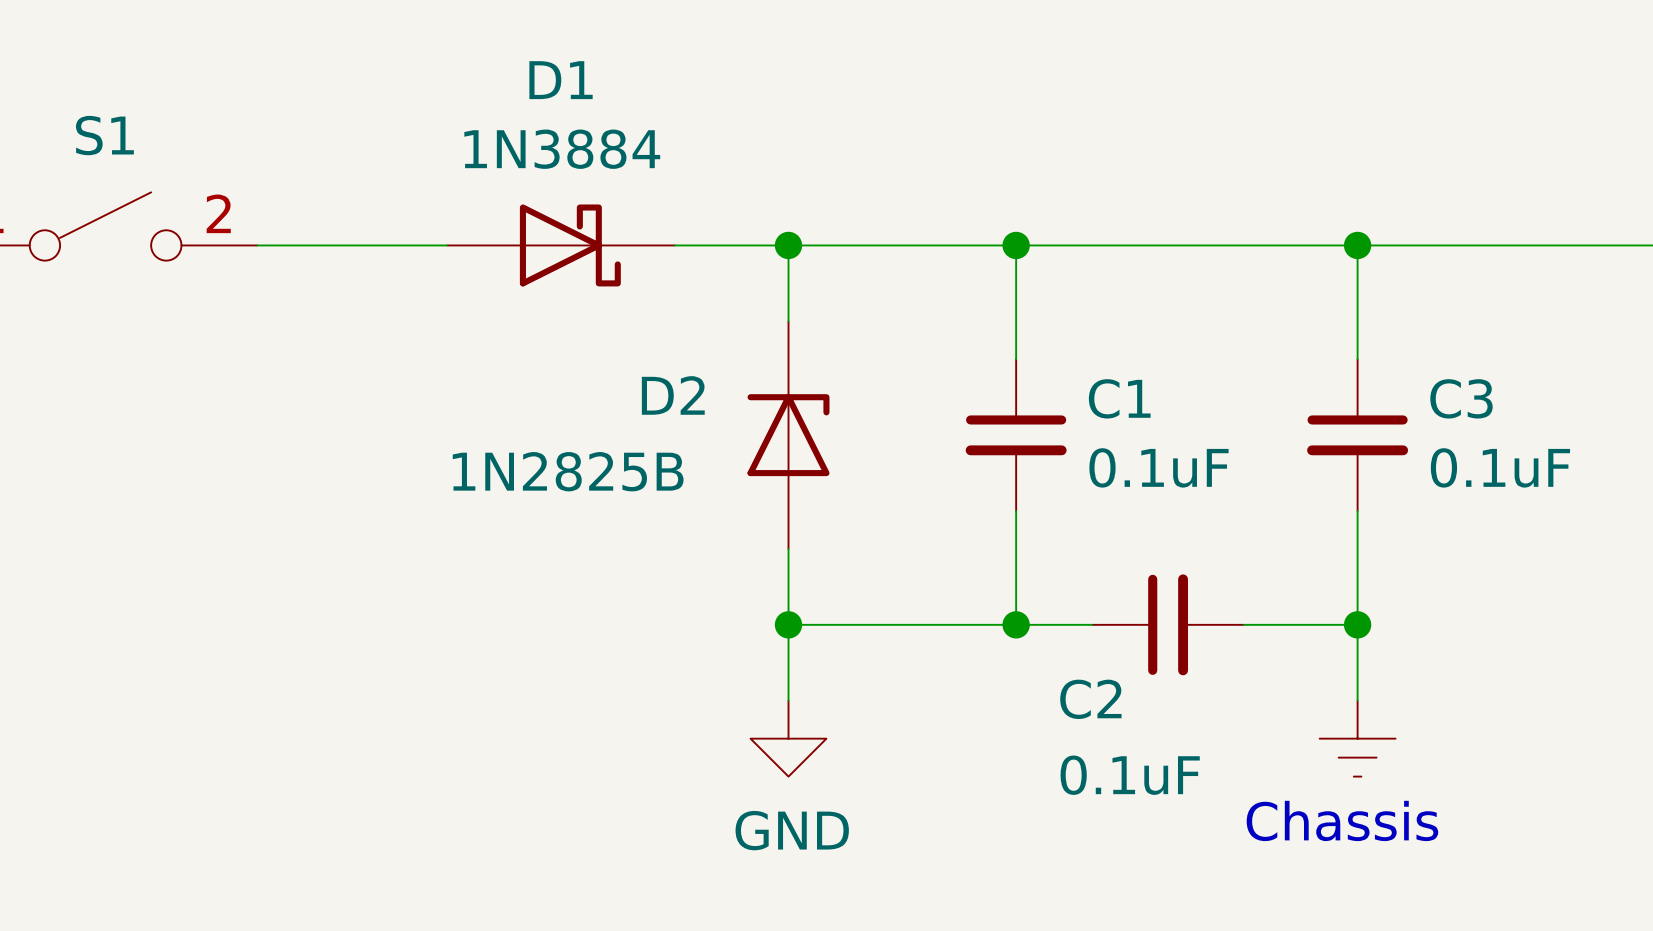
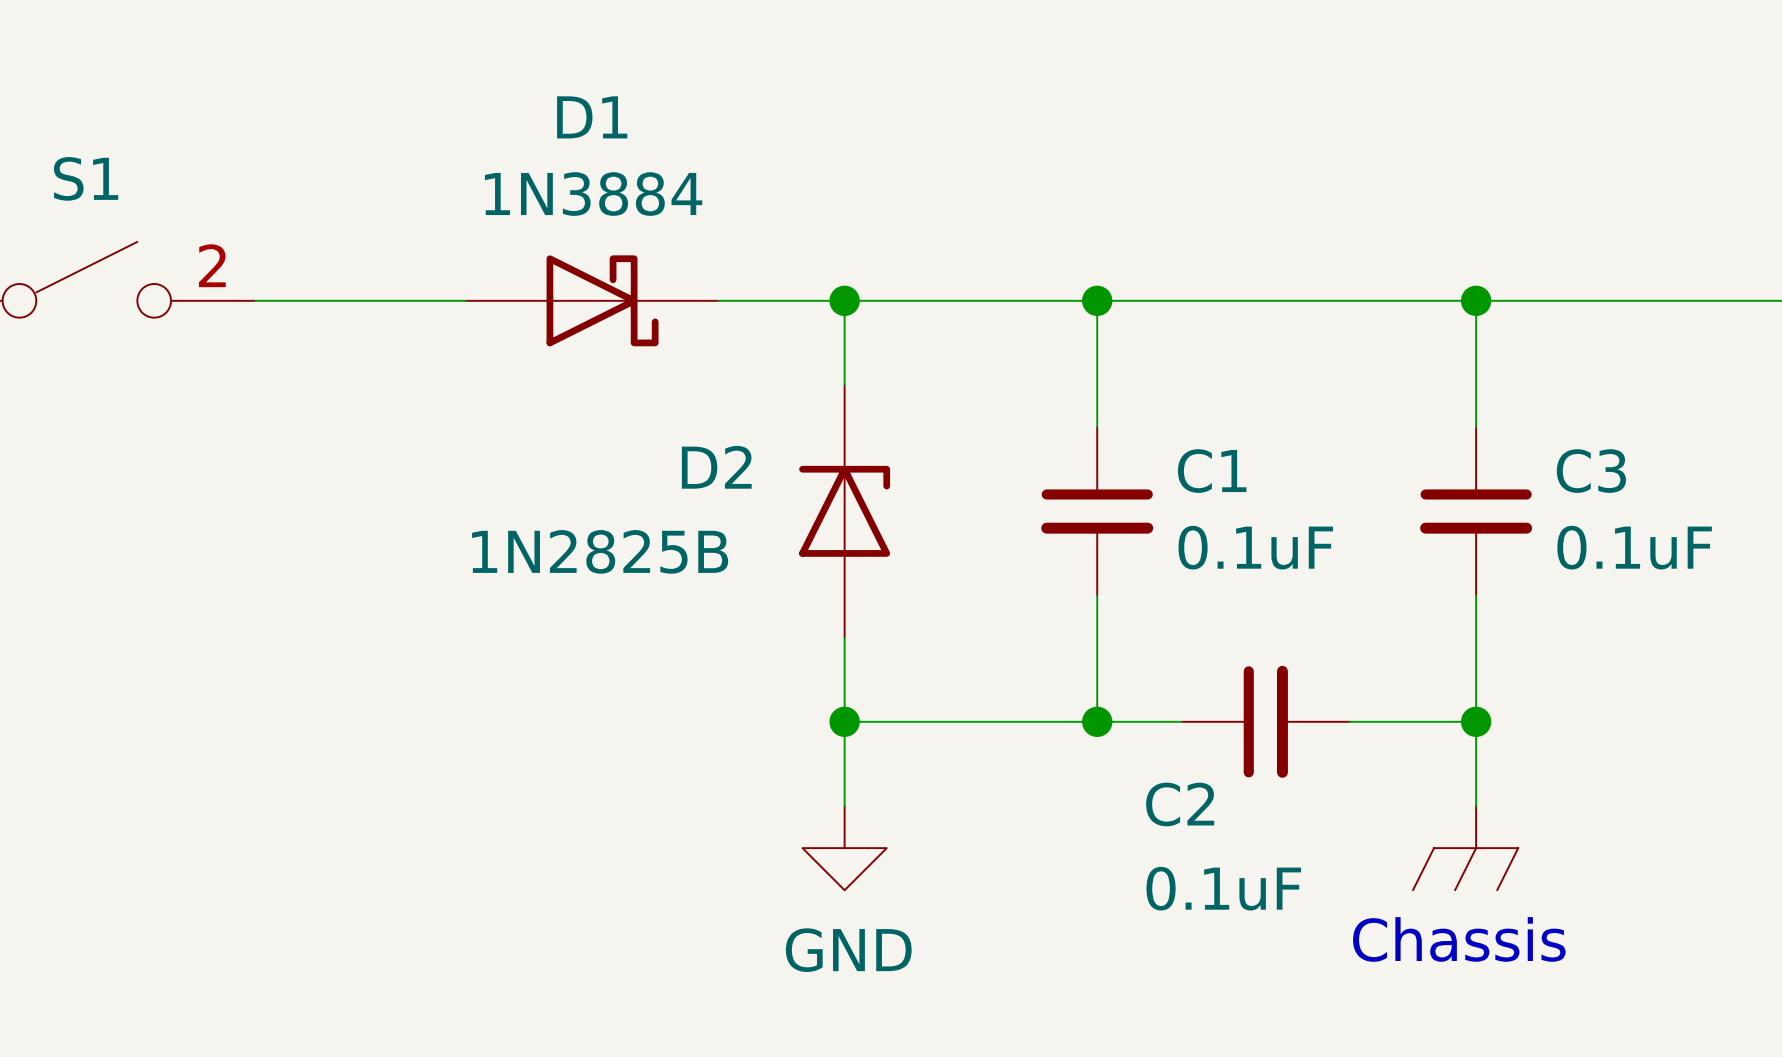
power symbol shape: [1319, 700, 1396, 777] -> [1412, 806, 1519, 891]

